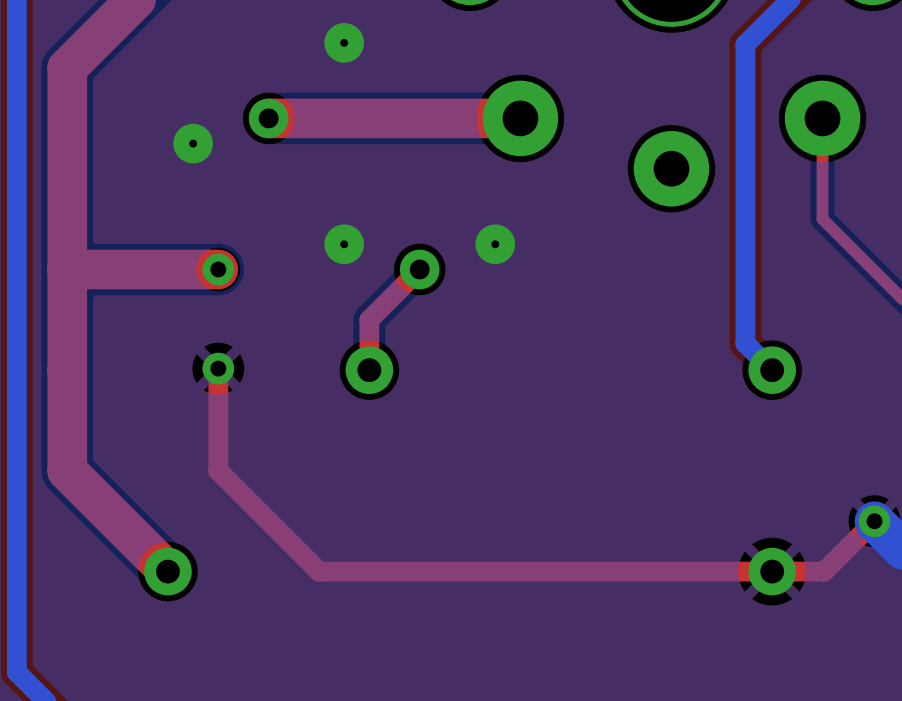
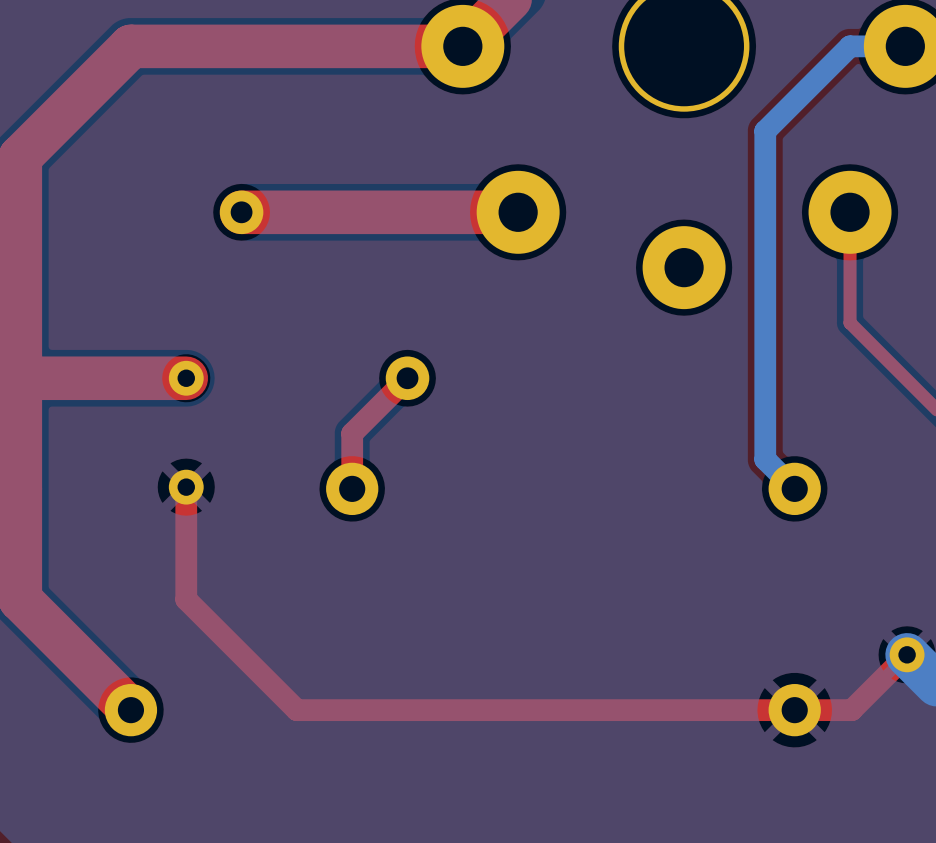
via: (344, 42) -> none
via: (193, 143) -> none
via: (344, 244) -> none
via: (495, 244) -> none

